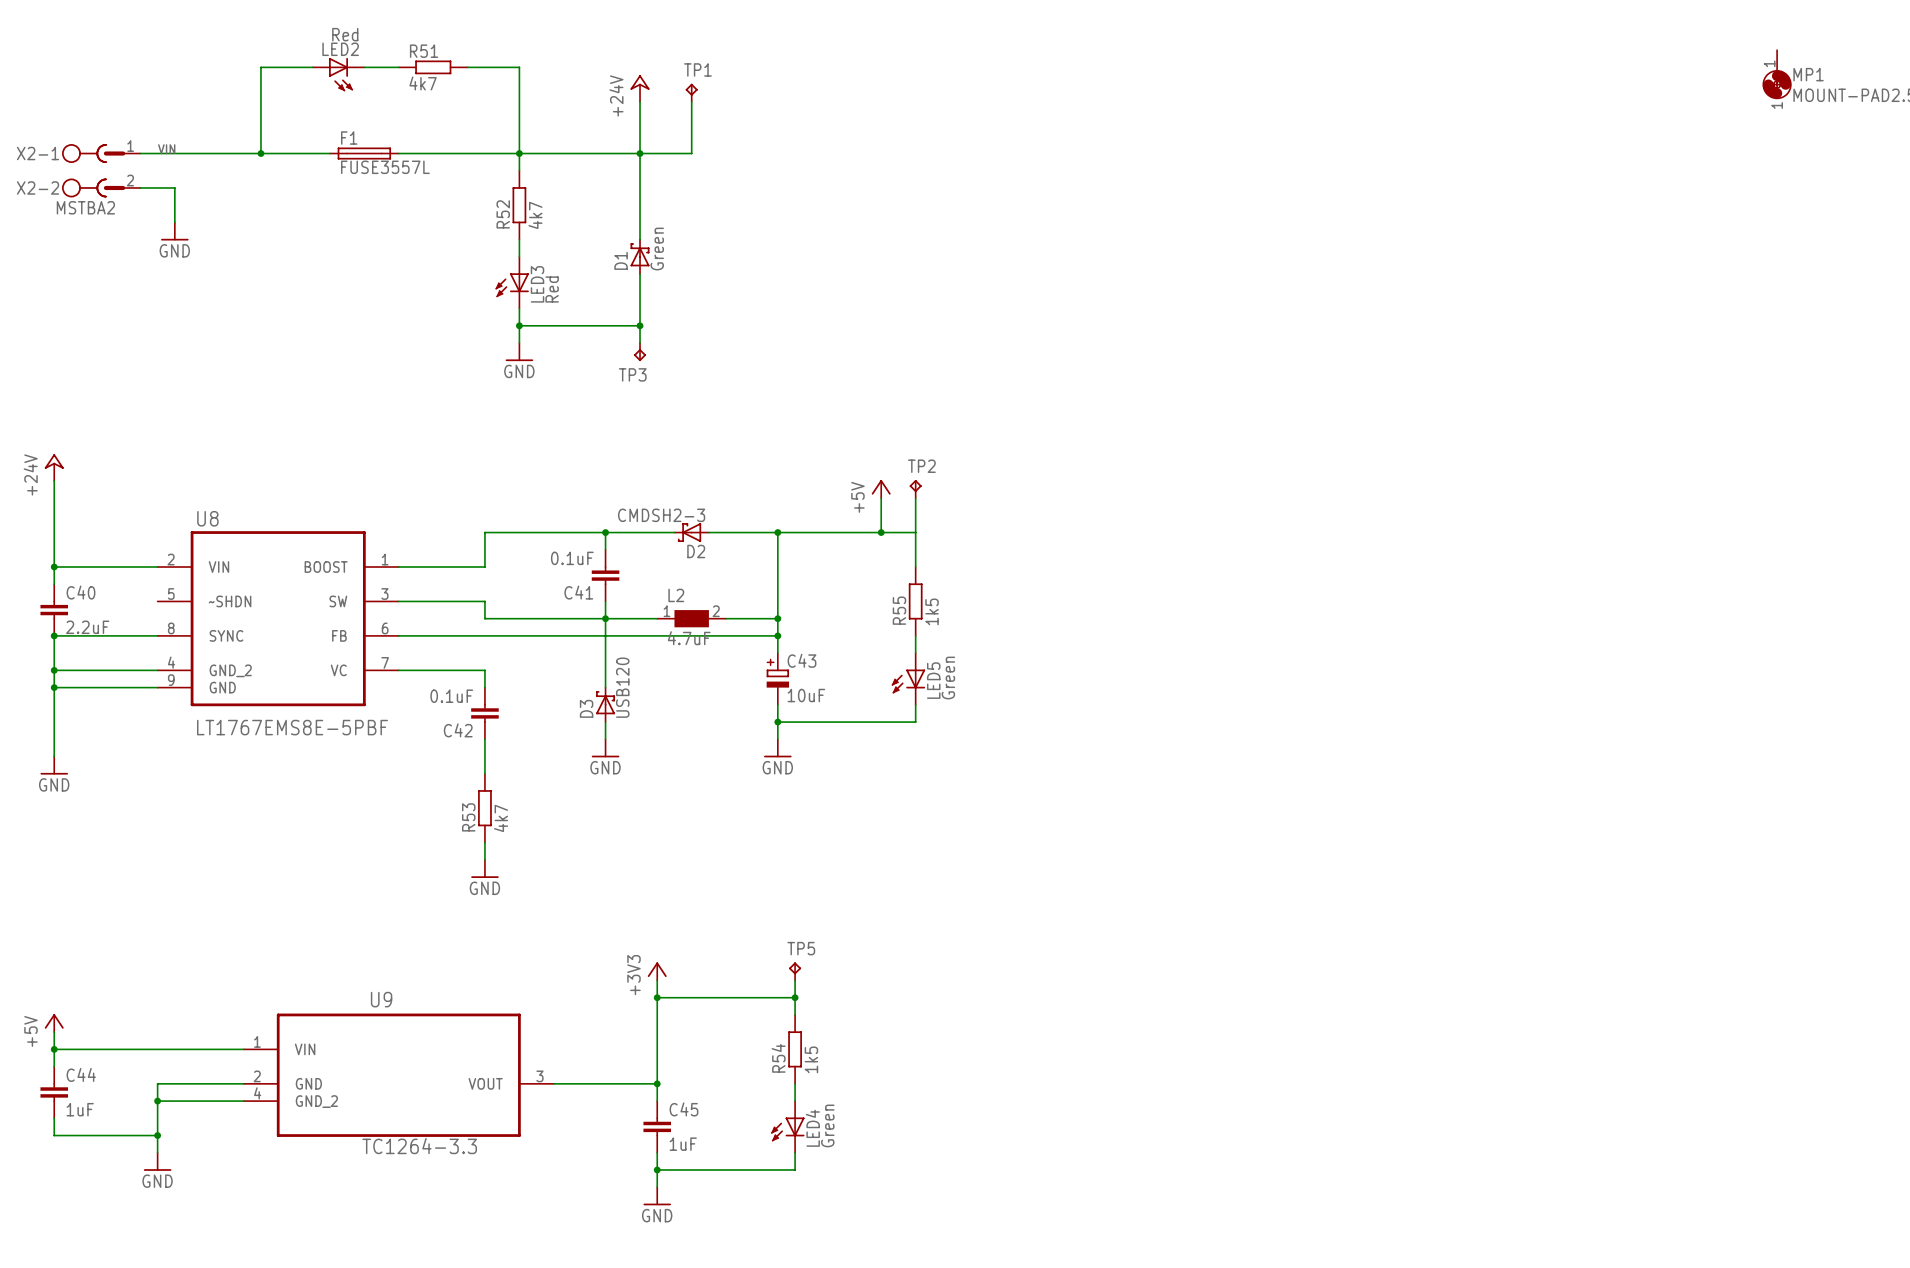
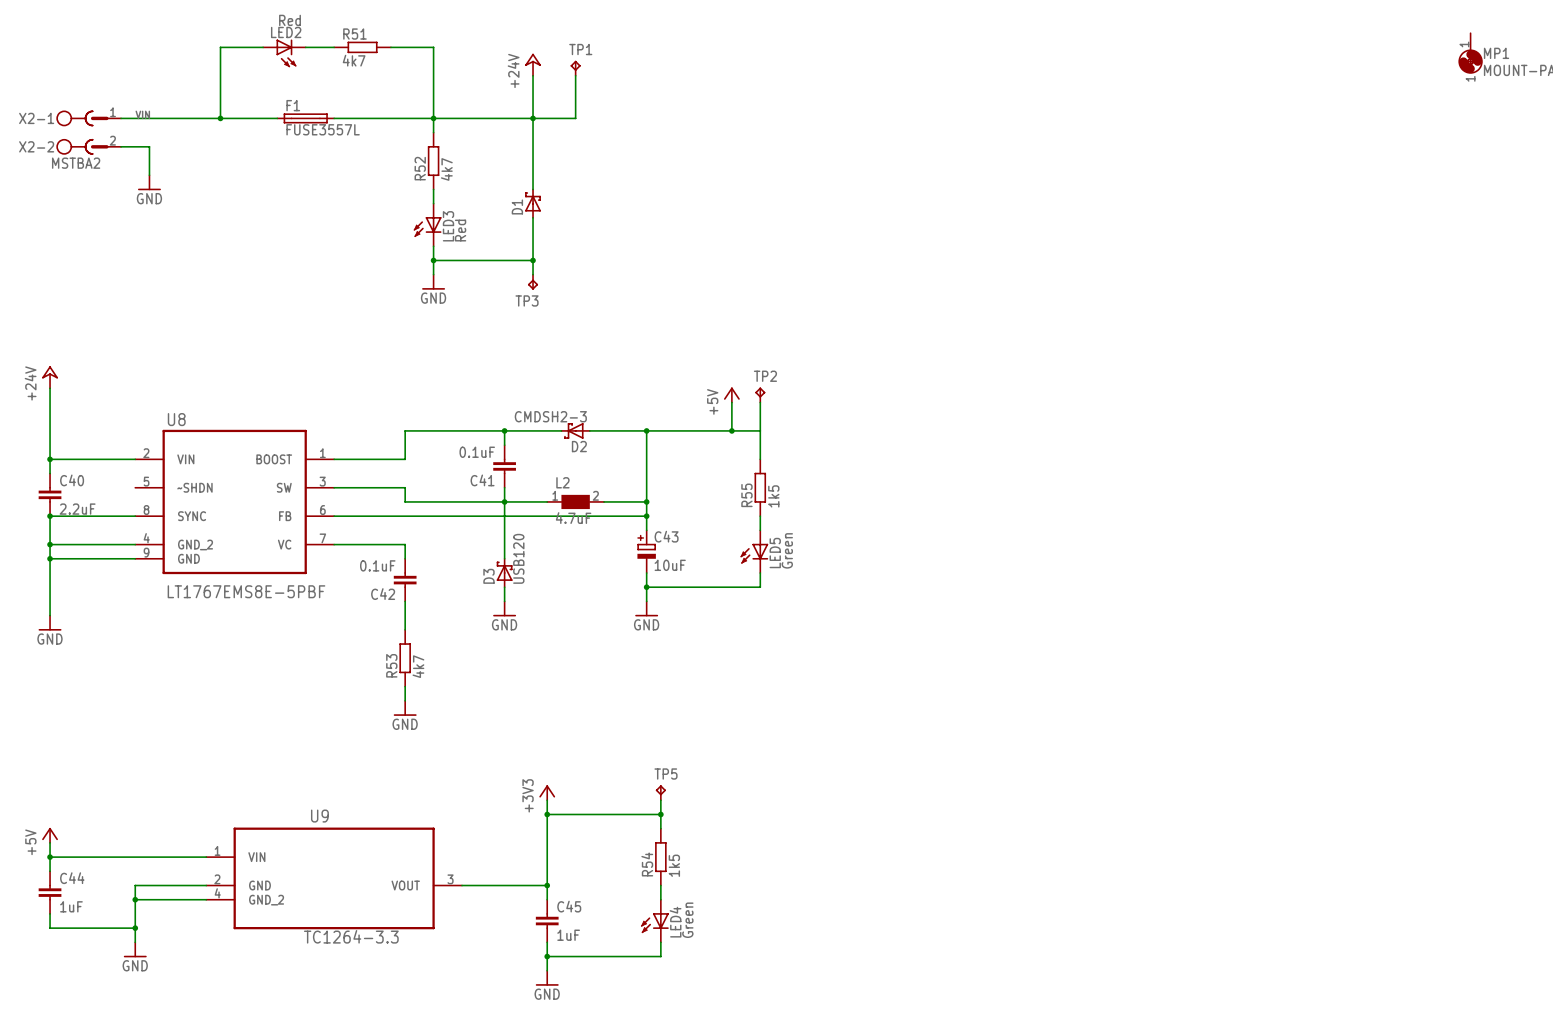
D1 value: Green (657, 249) -> none

